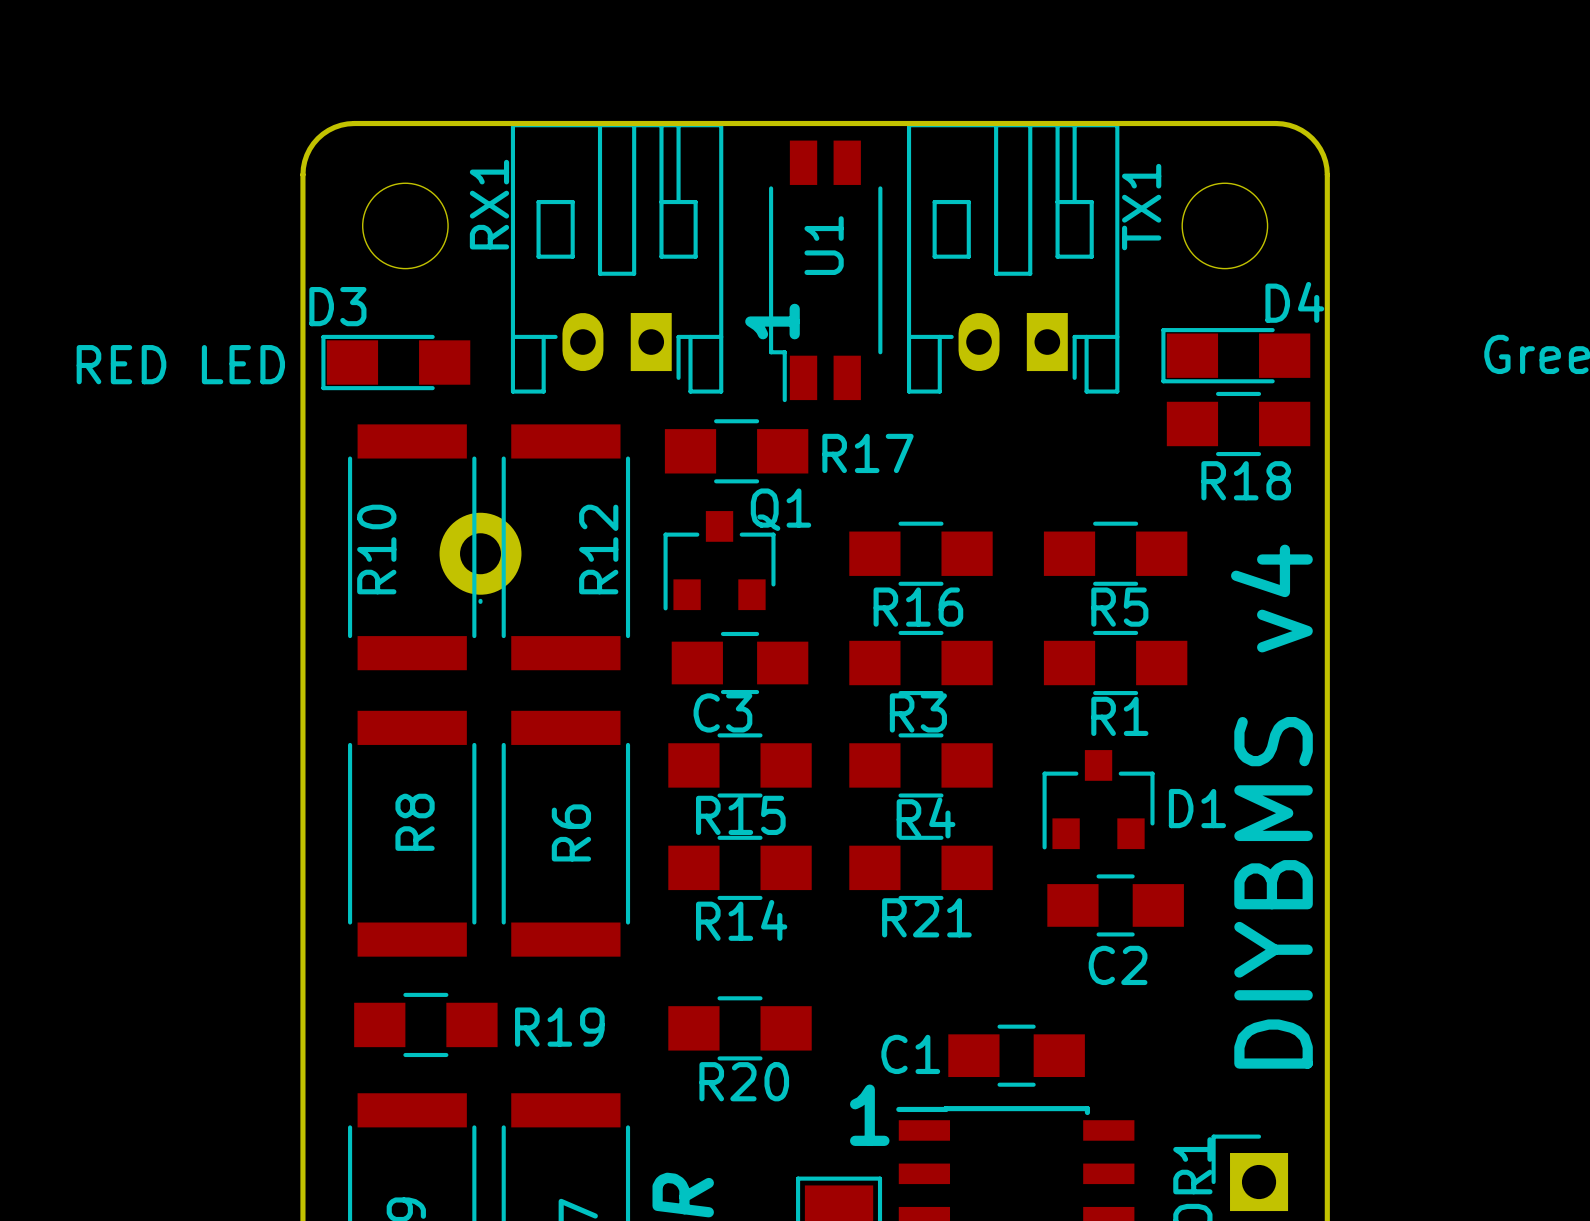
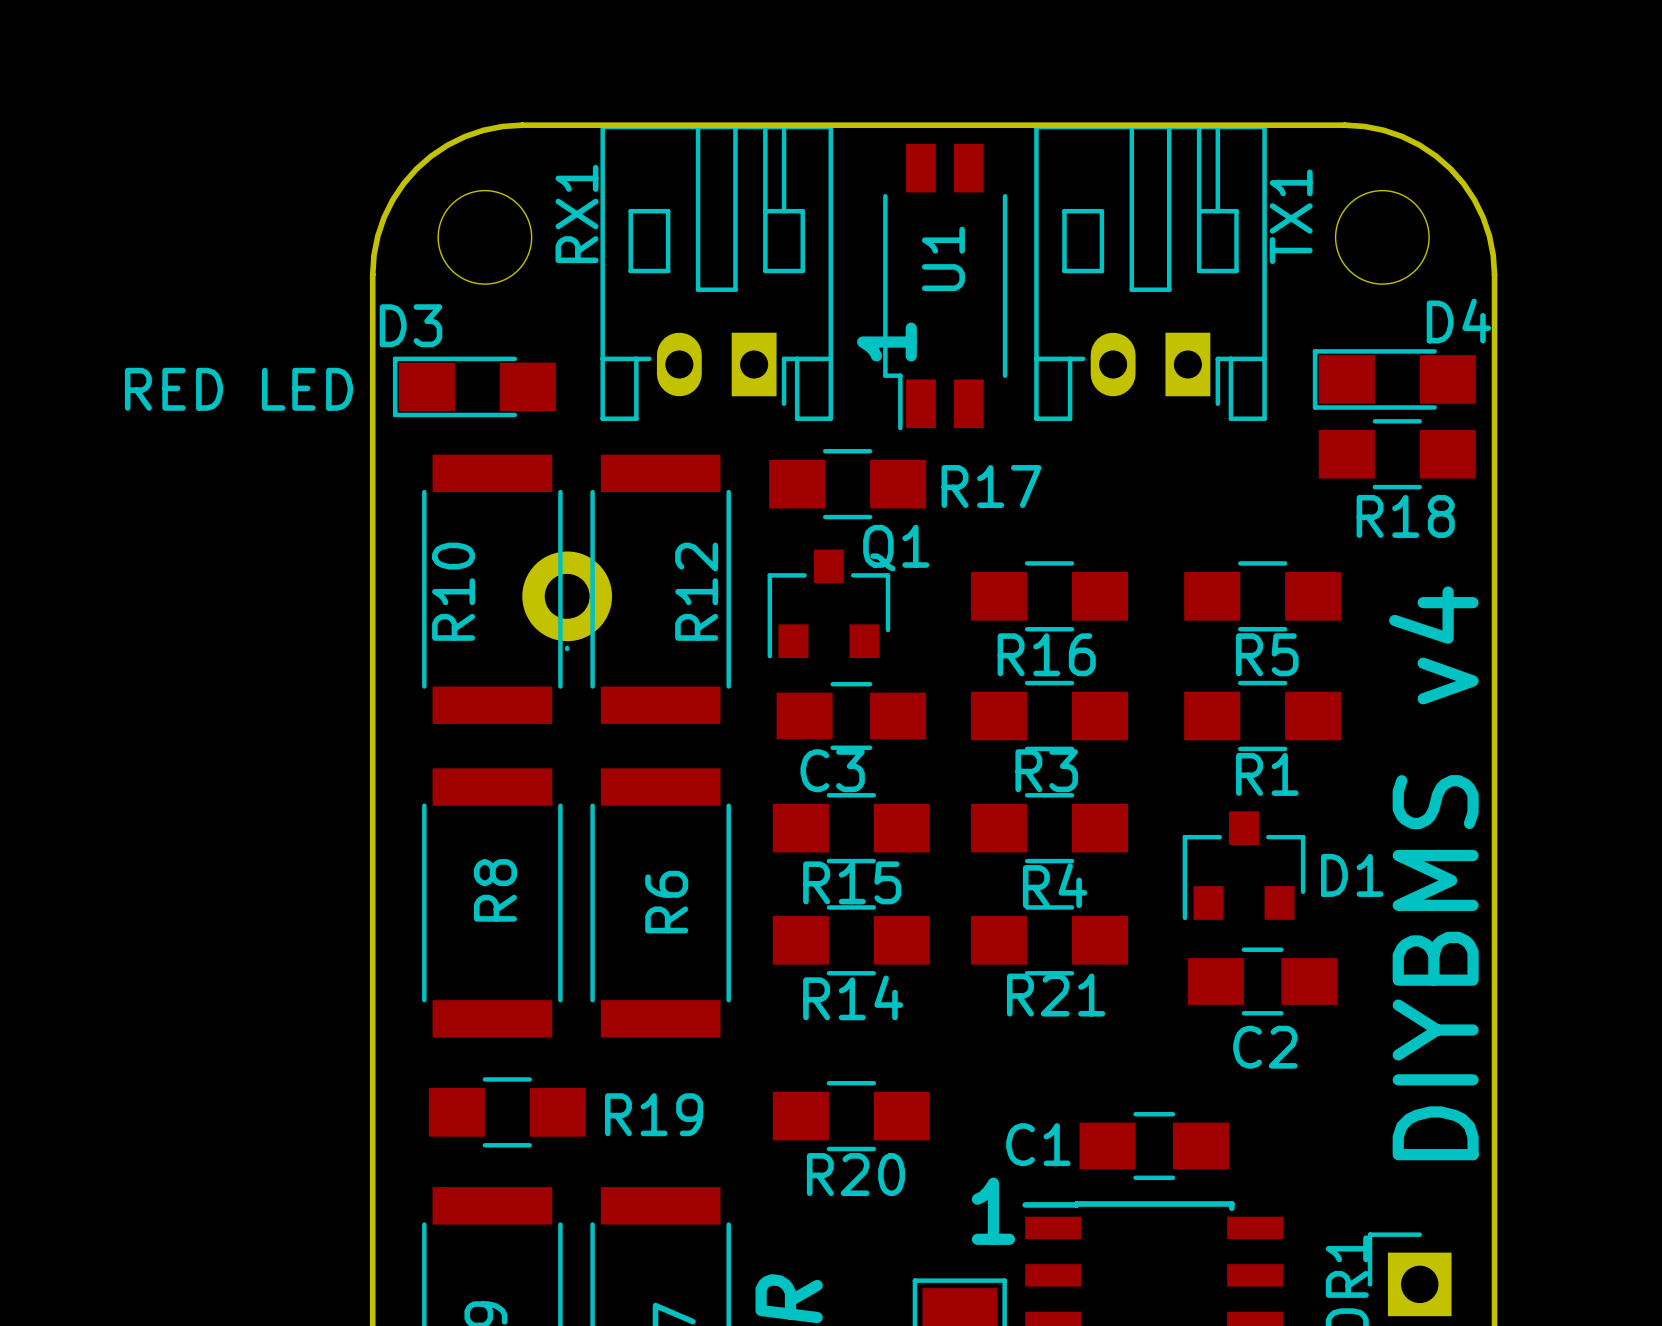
board edge: (439, 123) (347, 123) (334, 127) (317, 138) (306, 155) (303, 168) (302, 260) -> (522, 125) (502, 126) (465, 136) (447, 145) (416, 168) (403, 183) (384, 217) (377, 236) (372, 274)
board edge: (1190, 123) (1282, 123) (1295, 127) (1312, 138) (1323, 155) (1326, 168) (1327, 260) -> (1344, 125) (1364, 126) (1402, 136) (1436, 156) (1450, 168) (1474, 199) (1483, 217) (1489, 236) (1494, 274)

